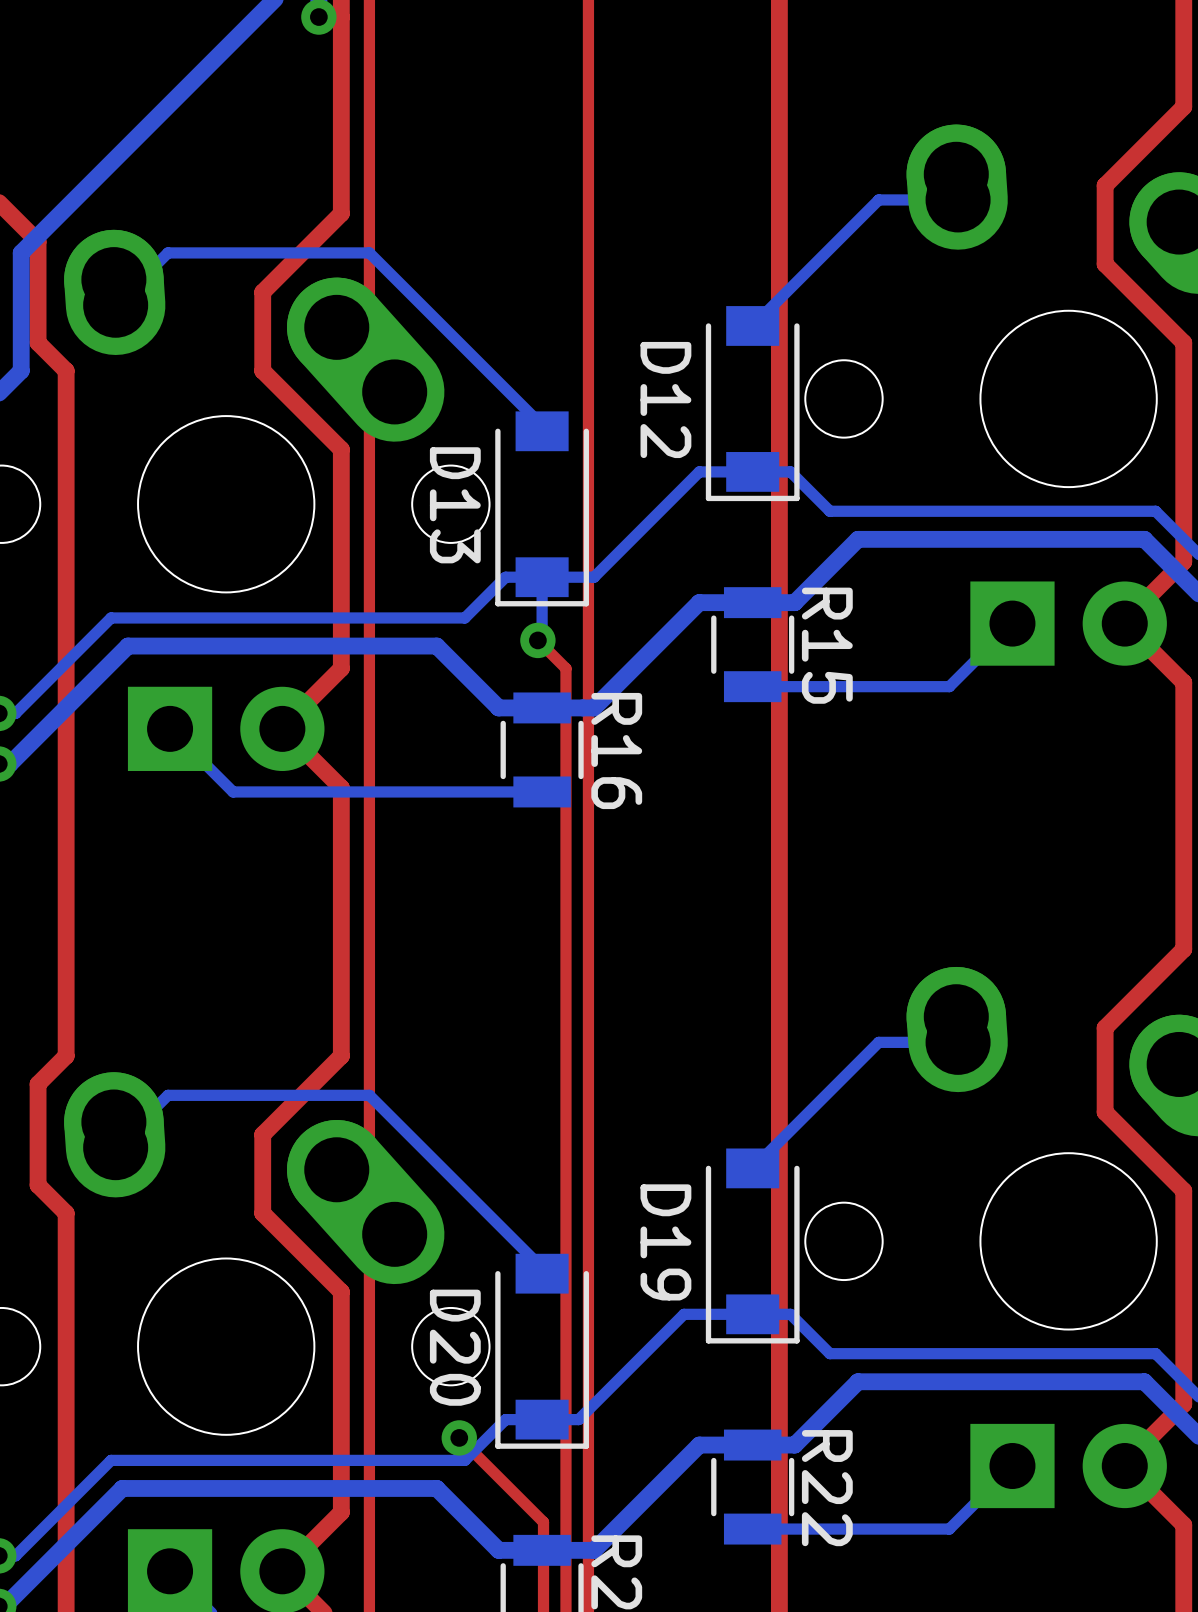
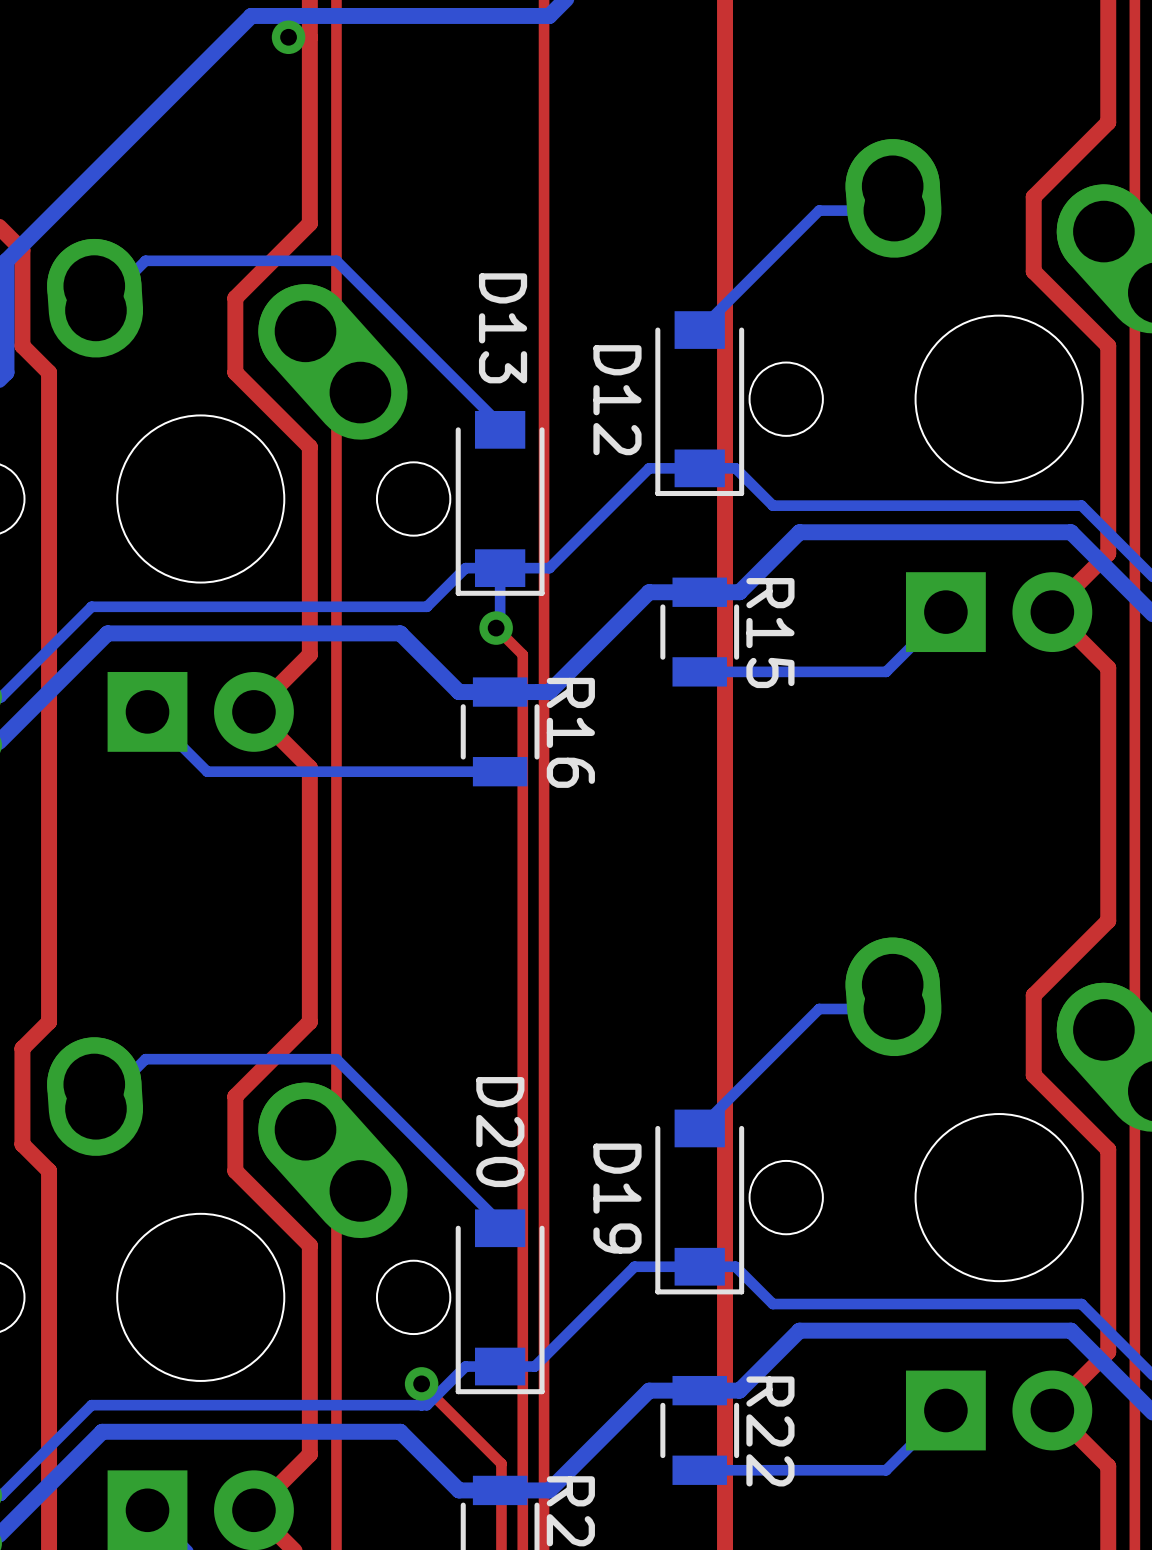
D13 name position: D13 (455, 505) -> D13 (503, 328)
D20 name position: D20 (455, 1347) -> D20 (500, 1132)

